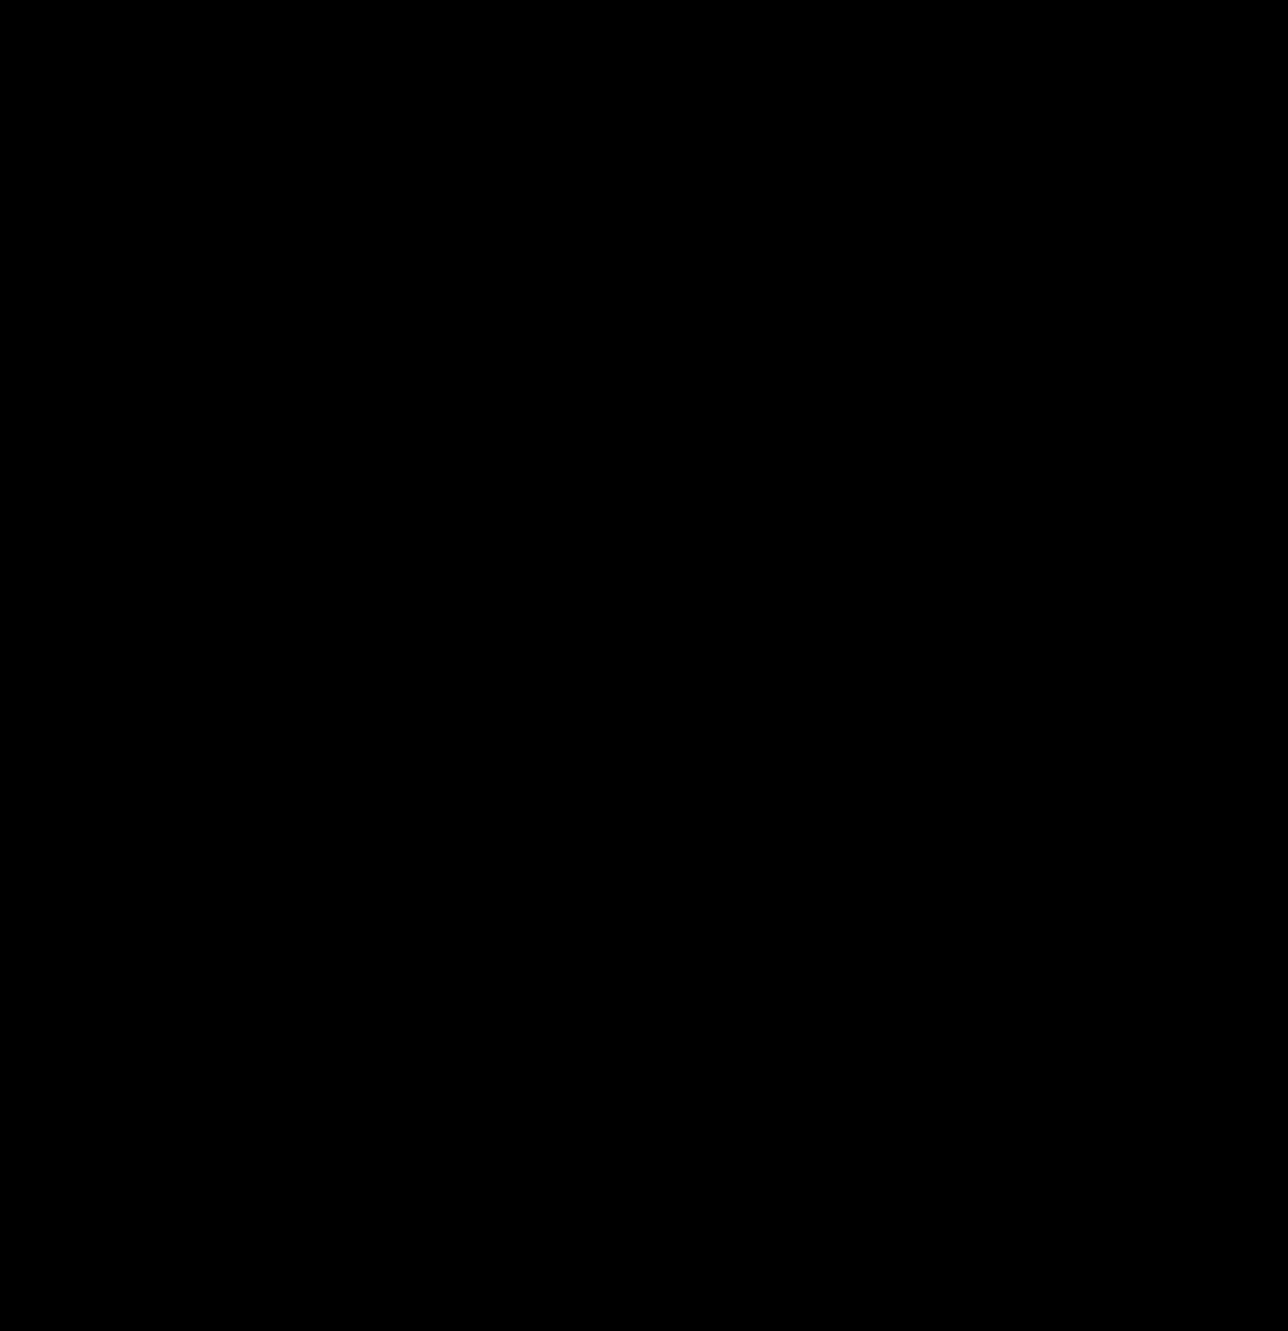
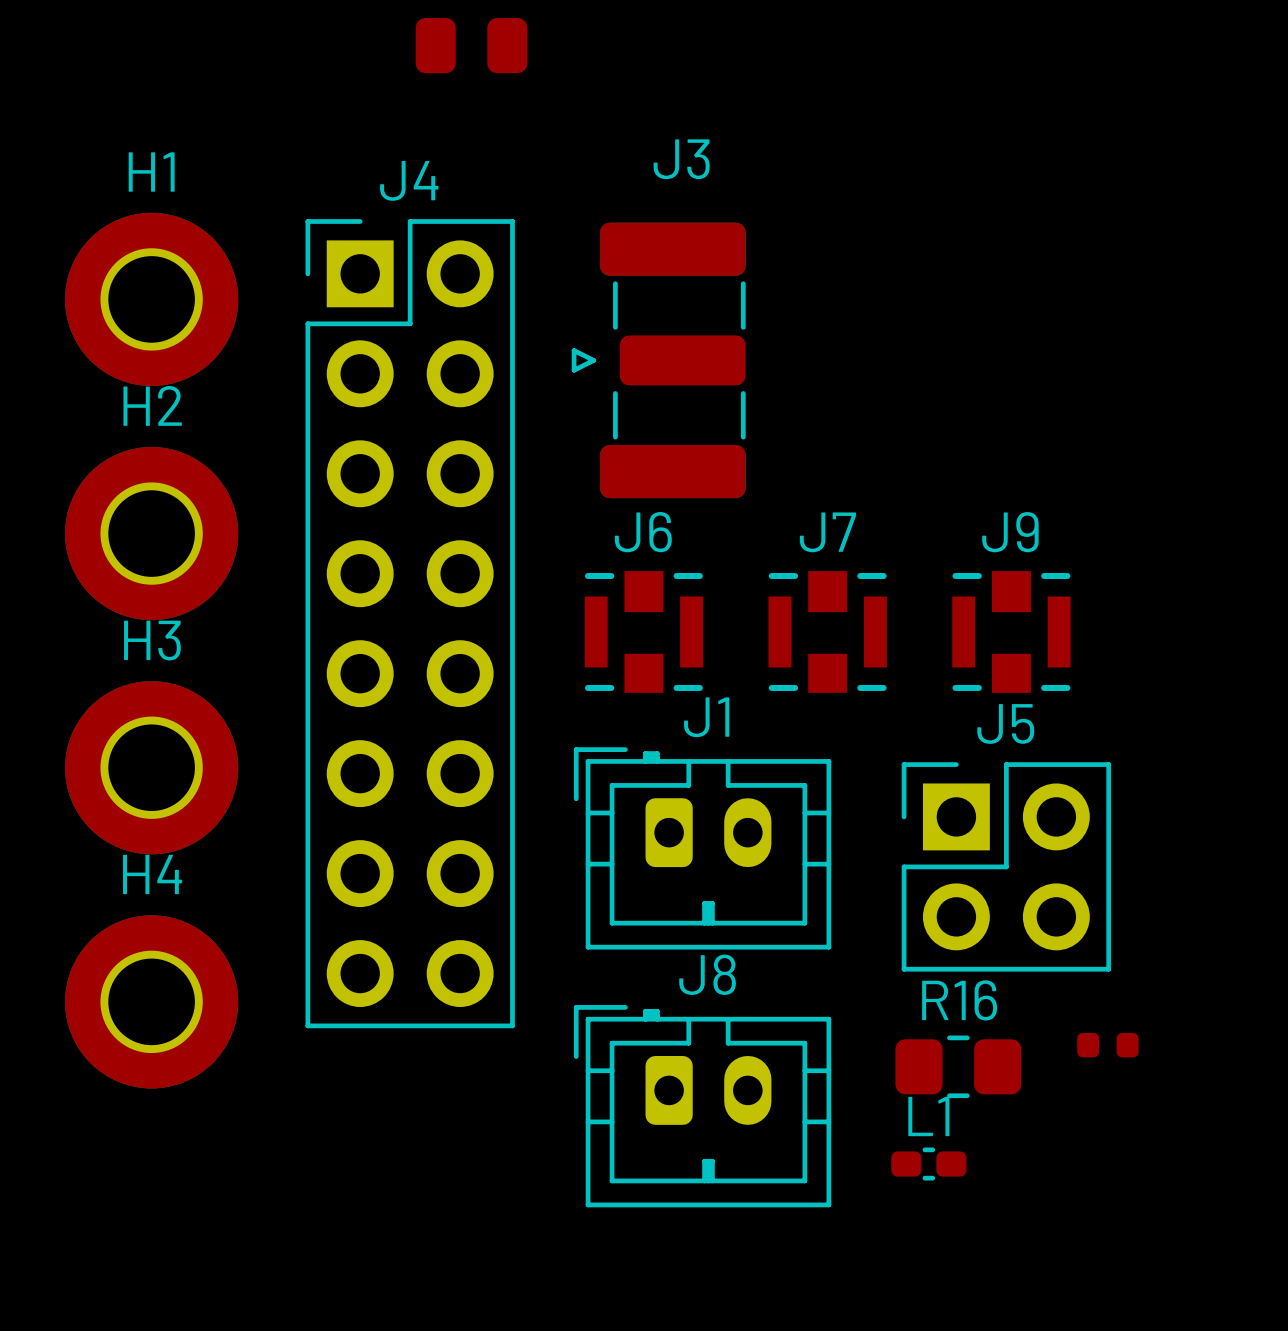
part: none -> (471, 45)
H1: none -> (151, 299)
J3: none -> (658, 360)
H2: none -> (151, 533)
J4: none -> (410, 623)
J6: none -> (643, 631)
J7: none -> (827, 631)
J9: none -> (1011, 631)
H3: none -> (151, 767)
J1: none -> (702, 848)
J5: none -> (1006, 866)
H4: none -> (151, 1001)
part: none -> (1107, 1045)
R16: none -> (958, 1066)
J8: none -> (702, 1106)
L1: none -> (928, 1164)

